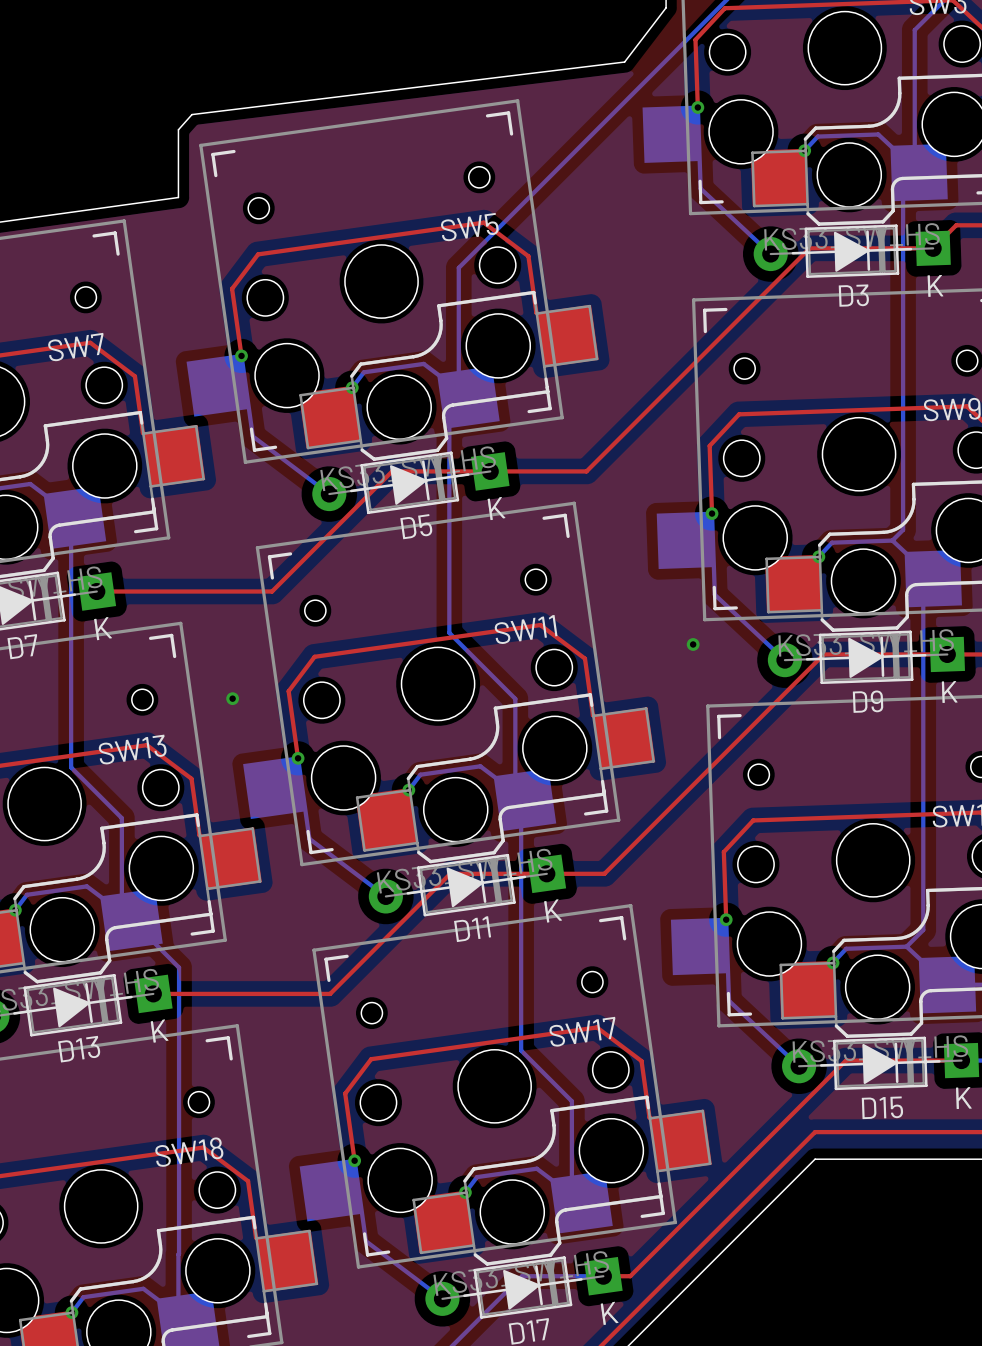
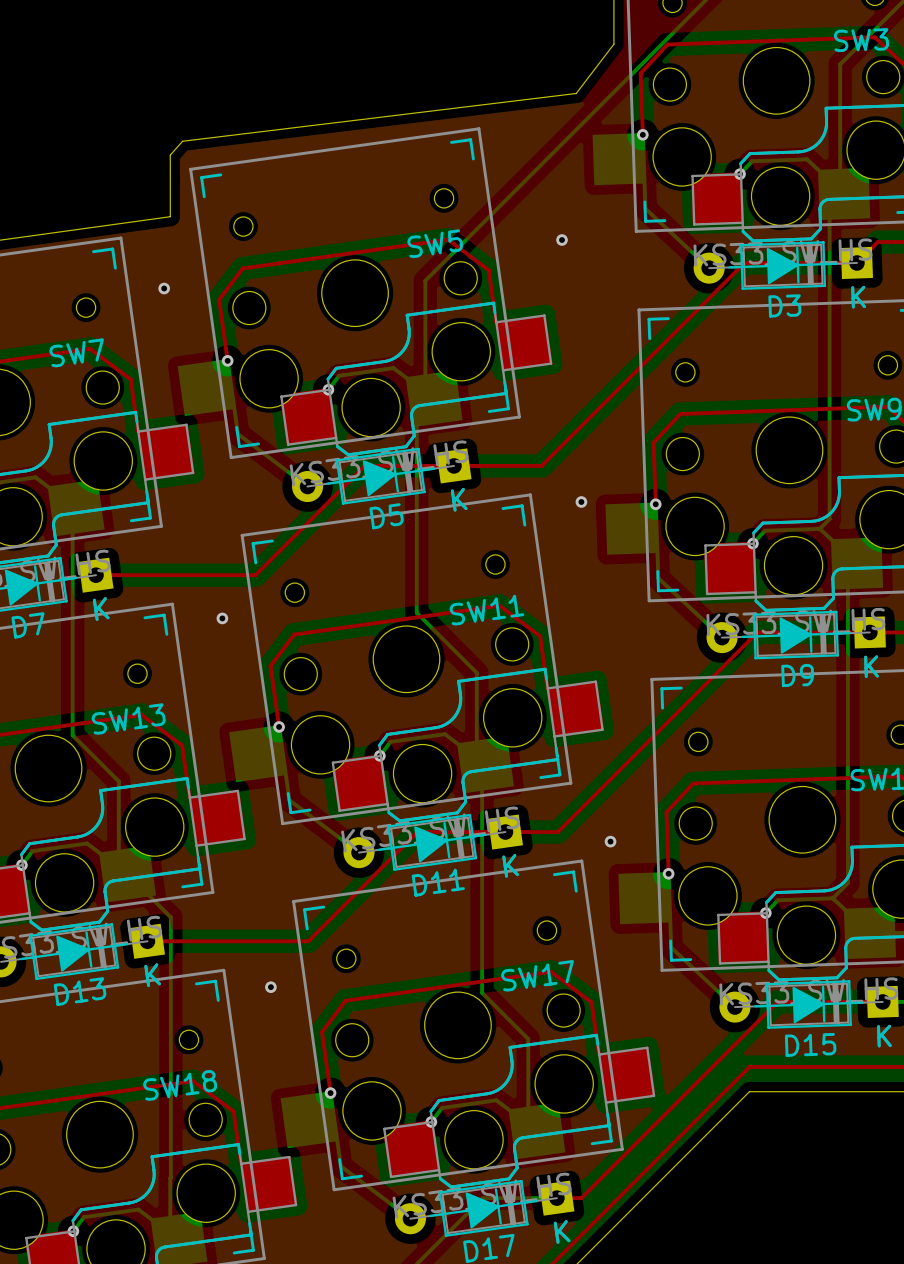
via: none -> (562, 240)
via: none -> (164, 288)
via: none -> (581, 501)
via: (693, 644) -> none
via position: (232, 698) -> (222, 618)
via: none -> (610, 841)
via: none -> (270, 987)

